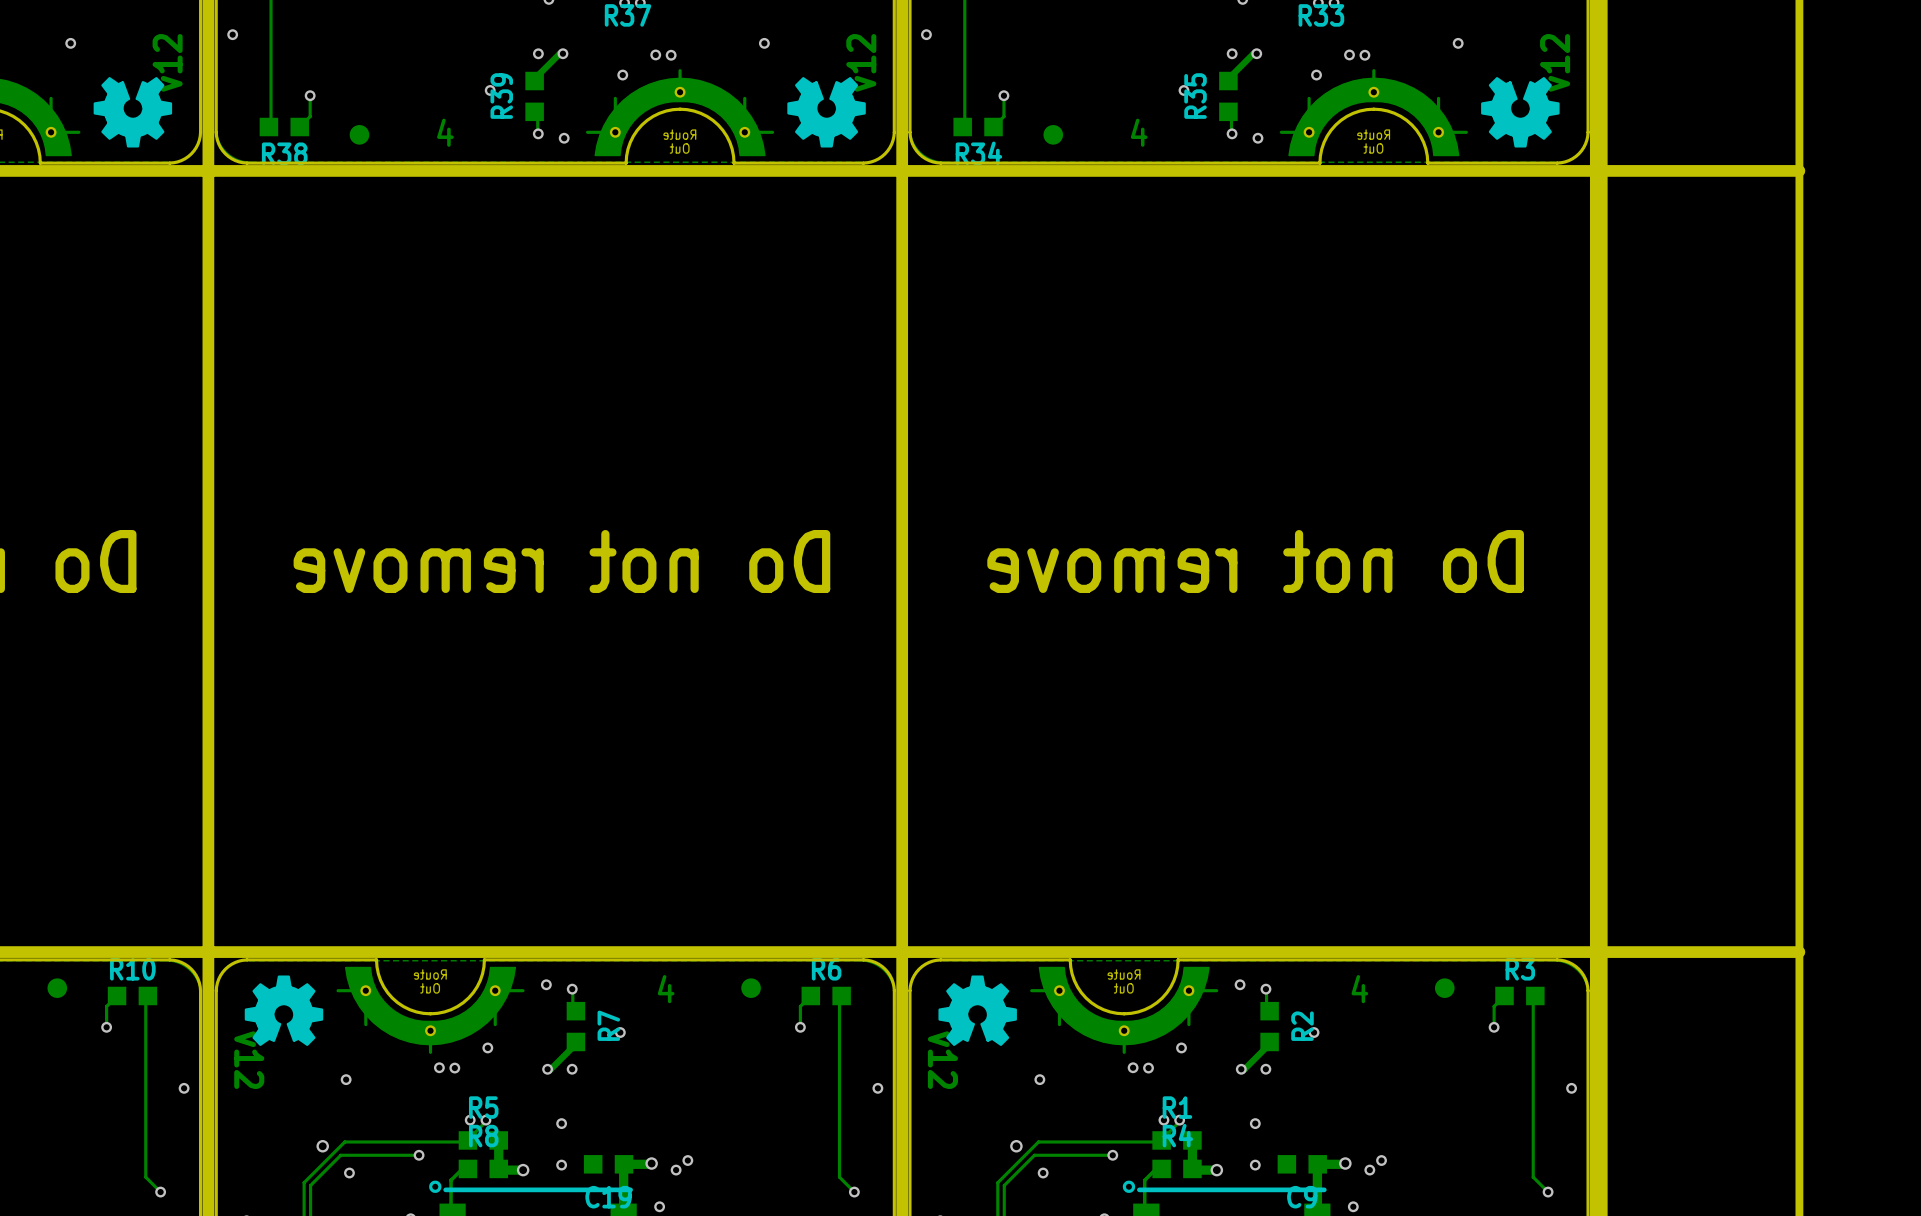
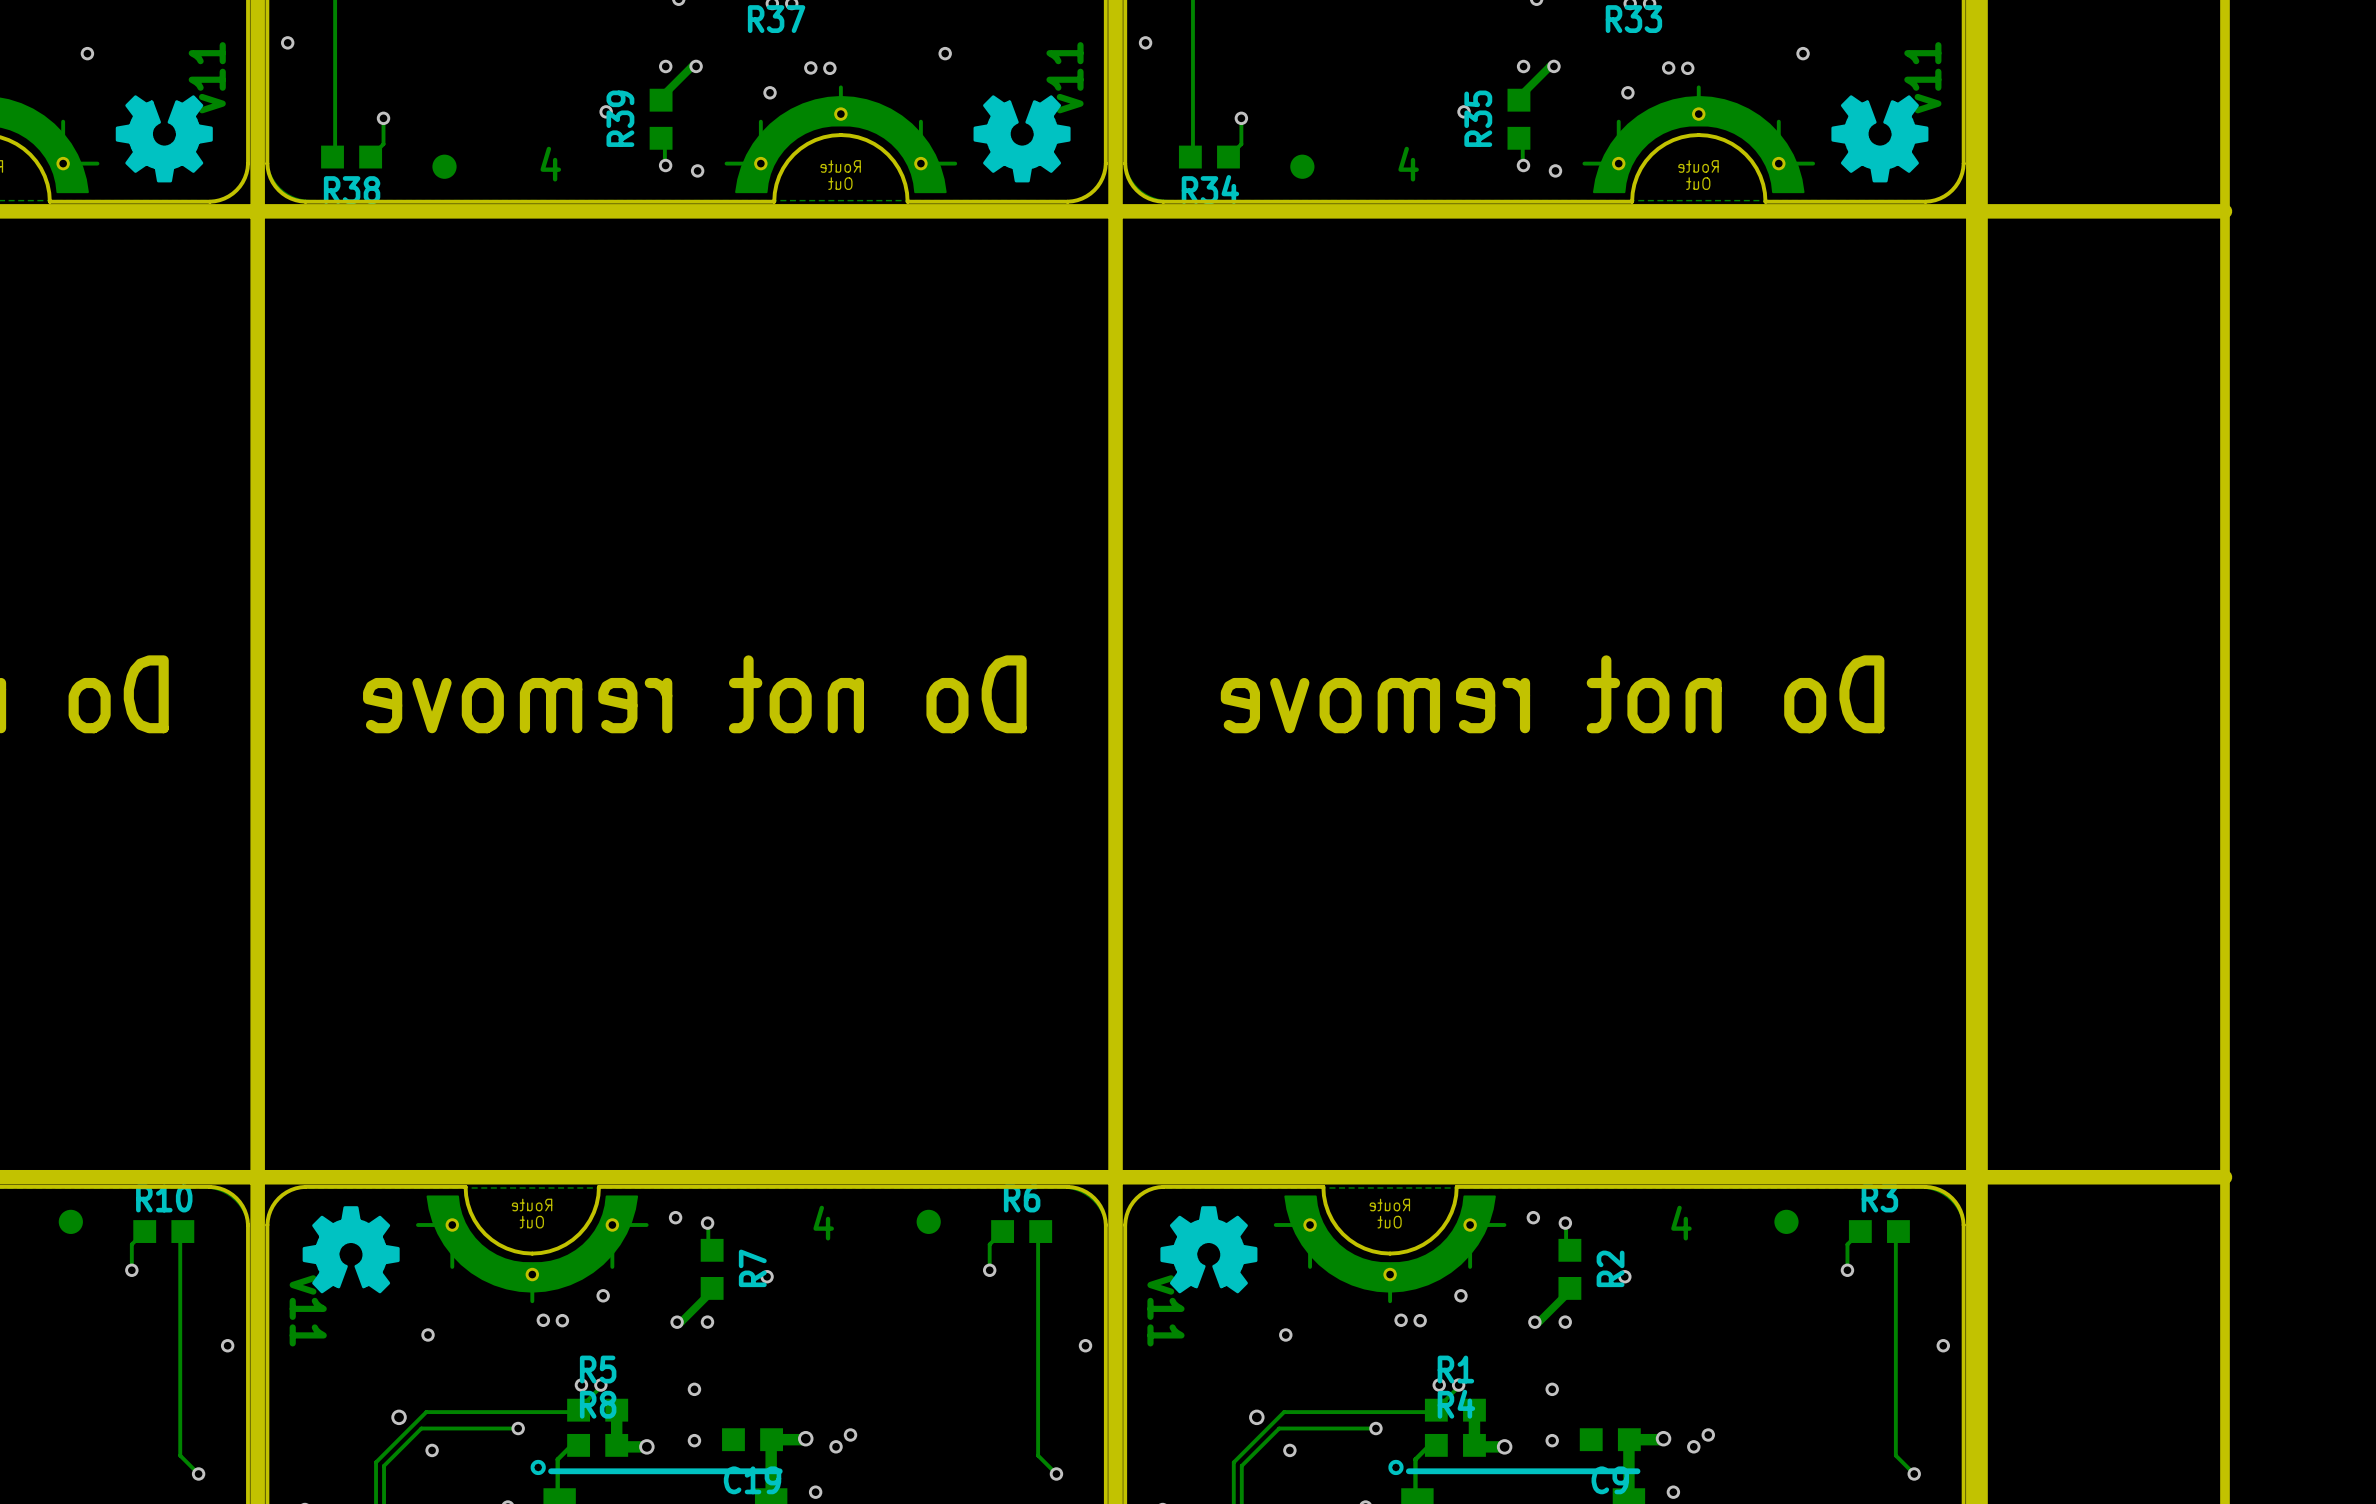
text: v12 (167, 62) -> v11 (207, 77)
text: v12 (861, 62) -> v11 (1065, 77)
text: v12 (1555, 62) -> v11 (1922, 77)
text: v12 (249, 1060) -> v11 (308, 1310)
text: v12 (942, 1060) -> v11 (1165, 1310)

